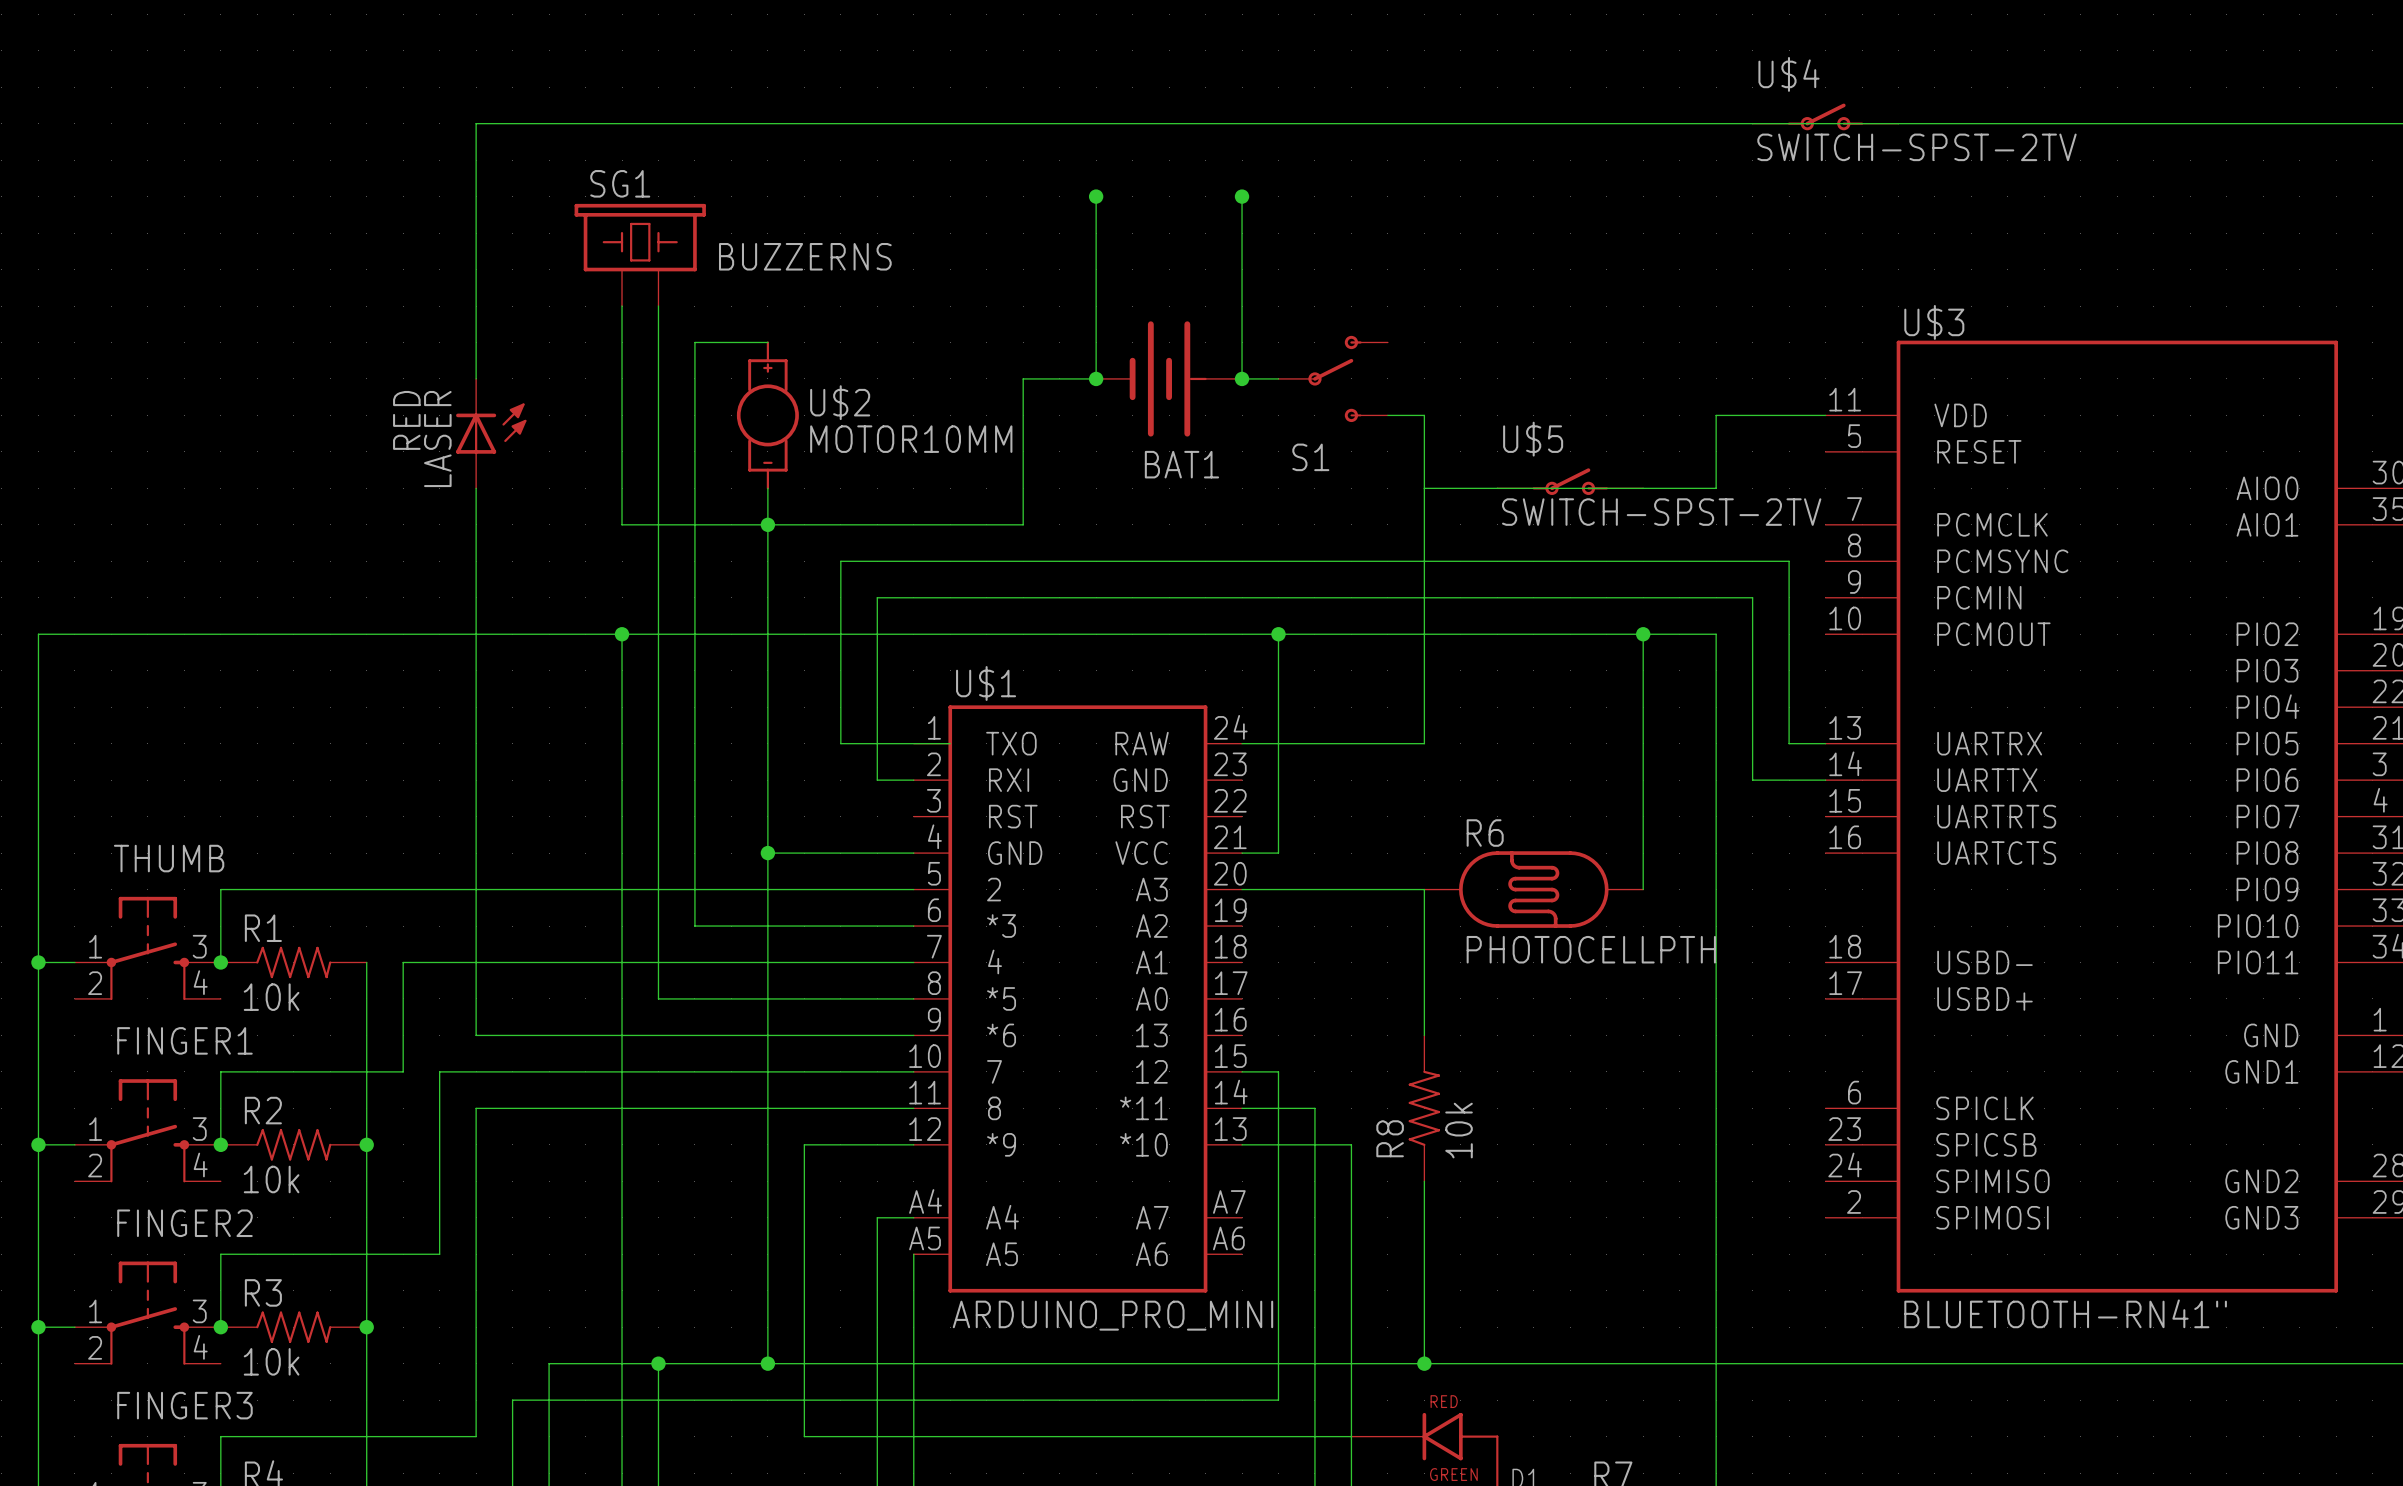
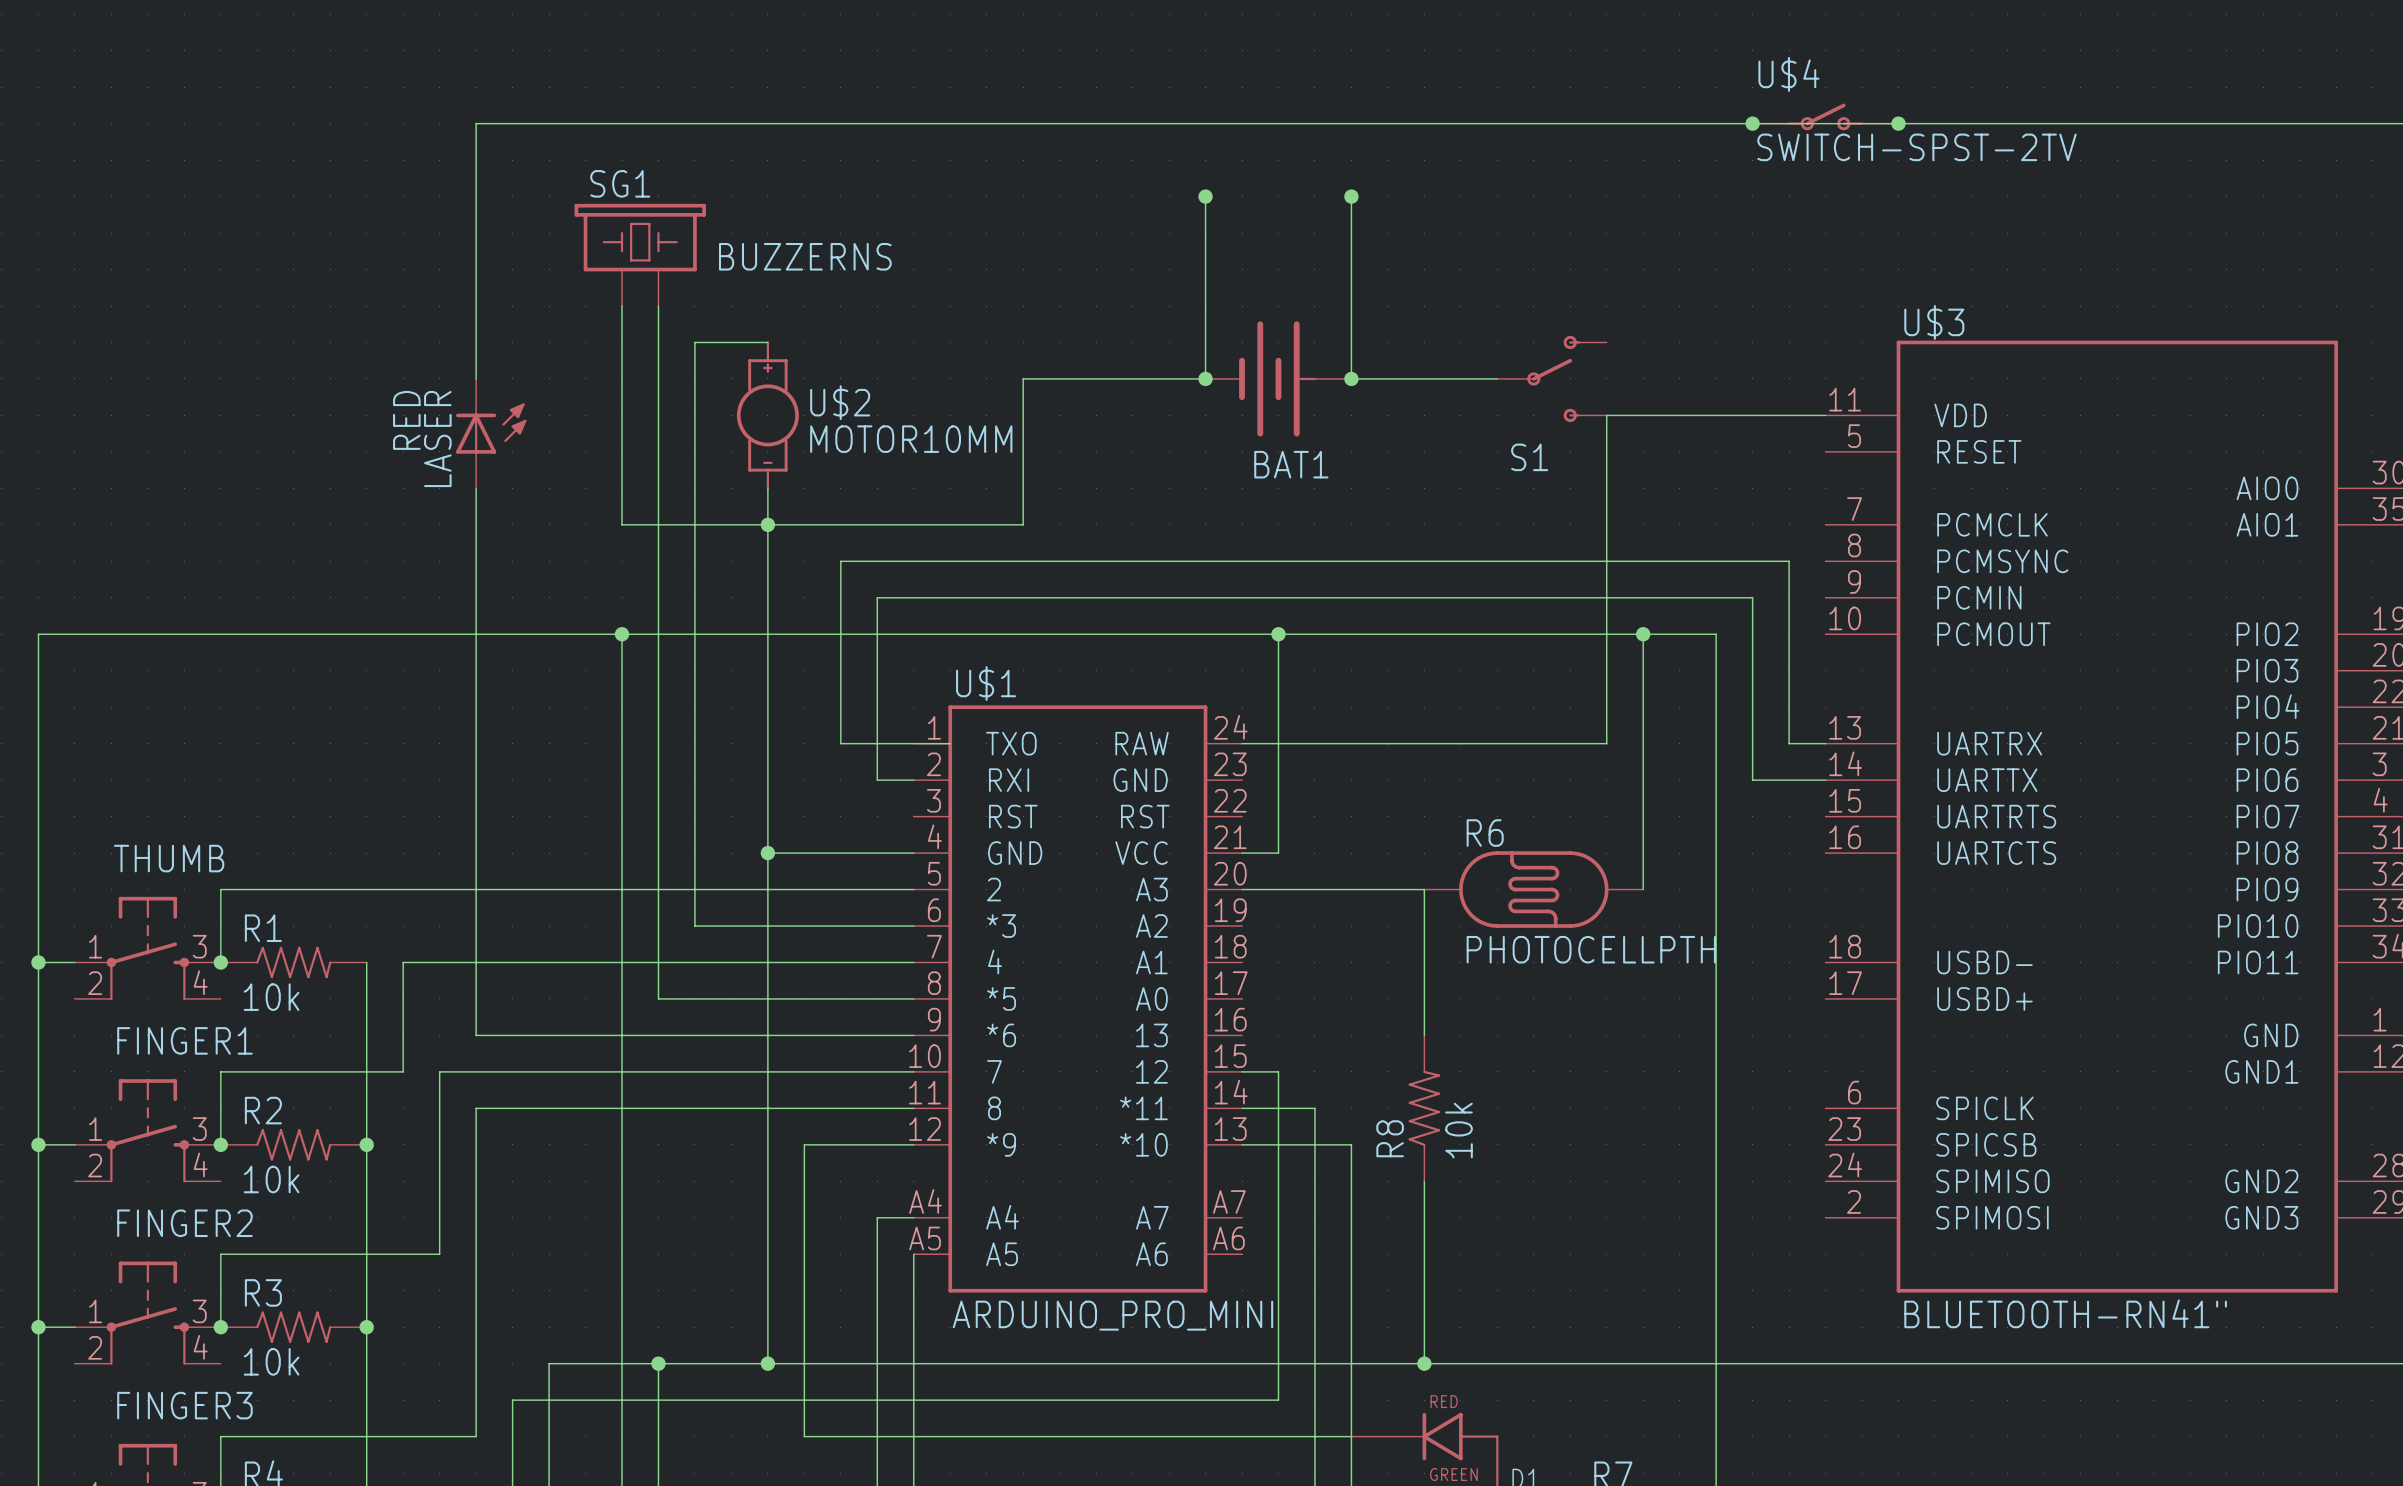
junction: none -> (1752, 123)
junction: none -> (1898, 123)
wire: (1096, 196) (1096, 378) -> (1205, 196) (1205, 378) (1096, 378)
junction: (1096, 196) -> none
wire: (1242, 196) (1242, 378) (1278, 378) -> none
junction position: (1242, 196) -> (1205, 196)
wire: none -> (1351, 196) (1351, 378) (1497, 378)
junction: none -> (1351, 196)
junction: (1096, 378) -> none
BAT1 position: (1169, 378) -> (1278, 378)
junction position: (1242, 378) -> (1205, 378)
S1 position: (1333, 378) -> (1552, 378)
junction: none -> (1351, 378)
wire: (1387, 415) (1424, 415) (1424, 743) -> none
wire: (1716, 415) (1716, 488) (1424, 488) -> (1716, 415) (1606, 415) (1606, 743) (1424, 743)
U$5: SWITCH-SPST-2TV (1570, 481) -> none

